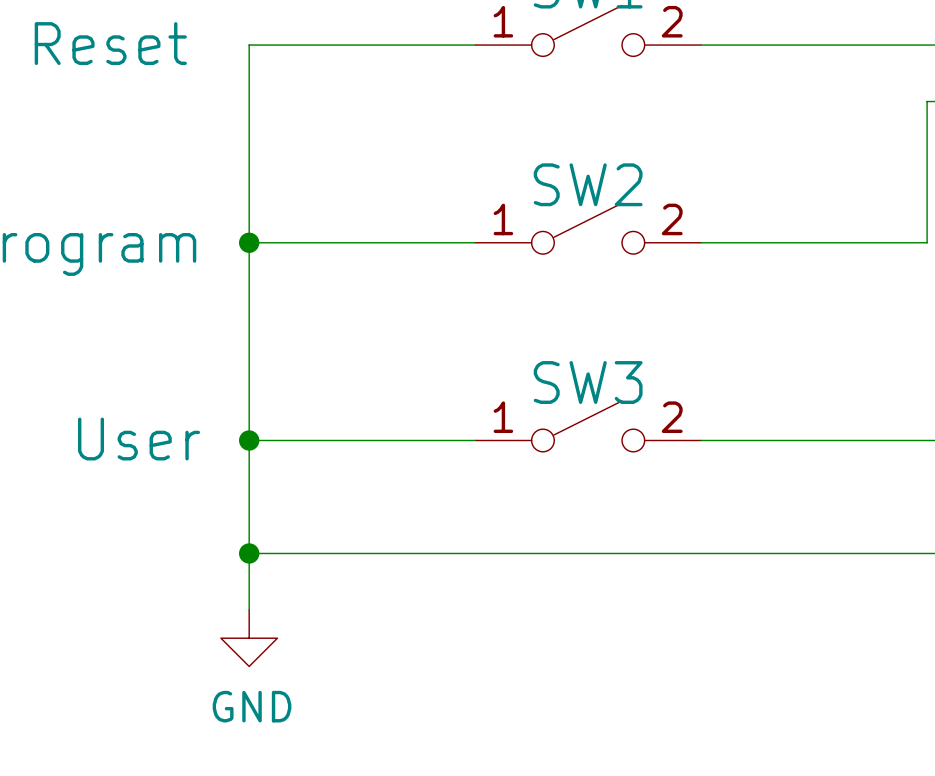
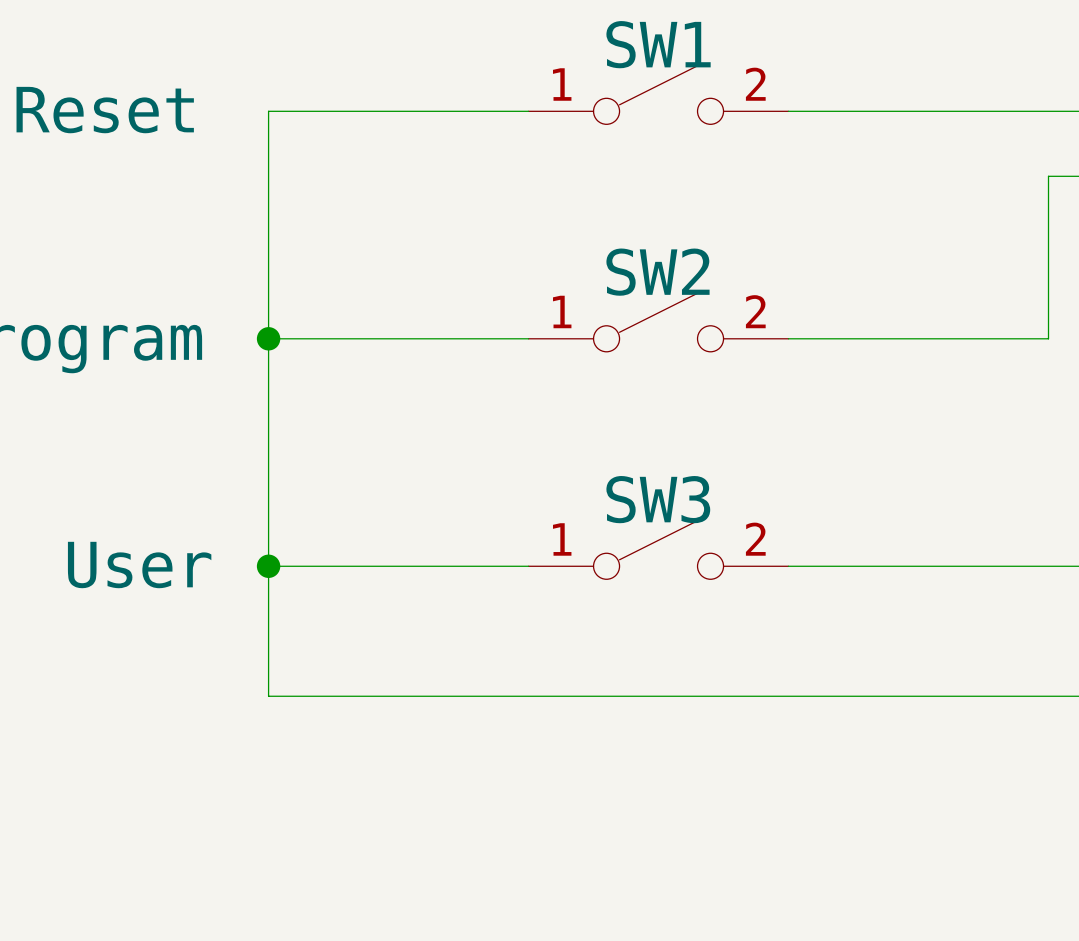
wire: (249, 553) (249, 609) -> none
junction: (249, 553) -> none
power symbol: GND (249, 638) -> none

